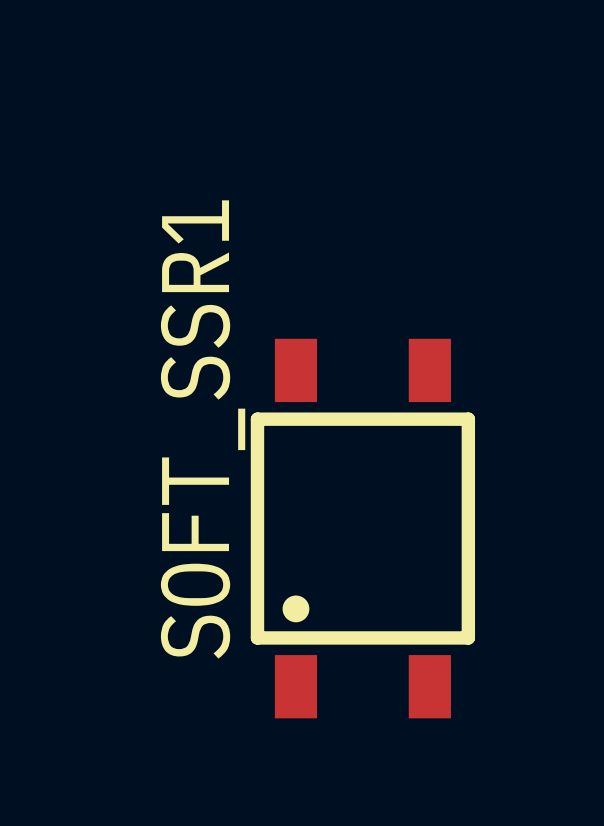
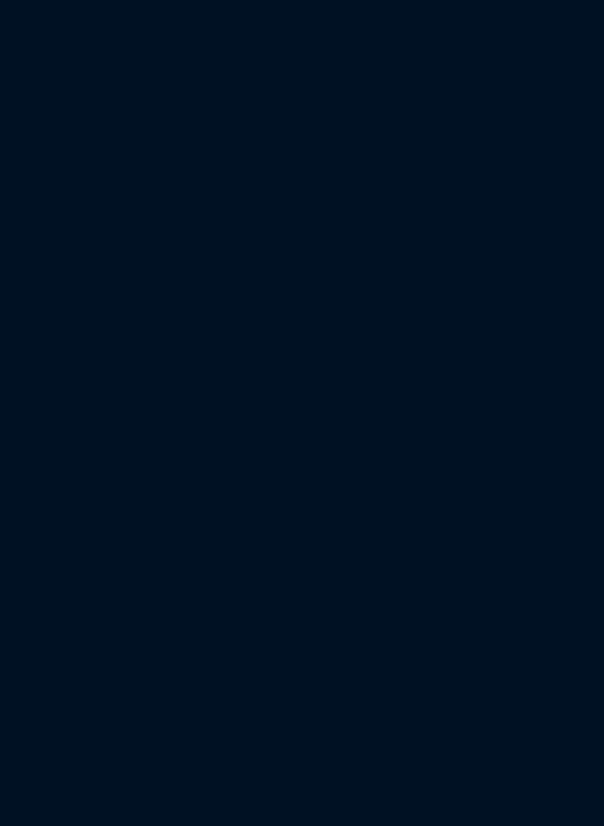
SOFT_SSR1: (362, 528) -> none

